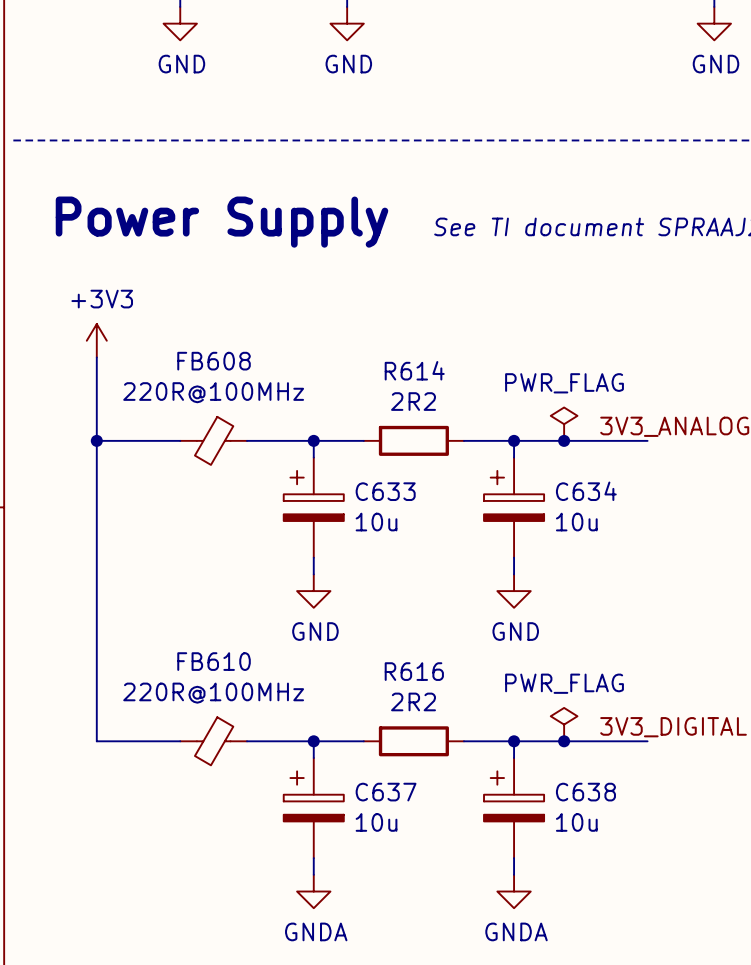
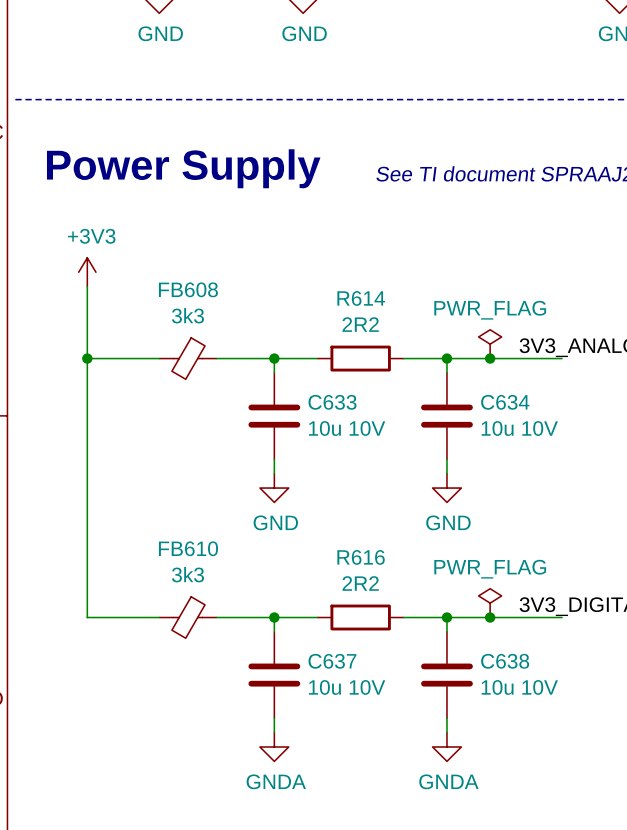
FB608 value: 220R@100MHz (213, 392) -> 3k3 (187, 315)
C633 symbol: [283, 457, 344, 558] -> [248, 372, 301, 460]
C634 symbol: [484, 457, 545, 558] -> [421, 372, 473, 460]
C633 value: 10u (376, 522) -> 10u 10V (347, 428)
C634 value: 10u (576, 522) -> 10u 10V (519, 428)
FB610 value: 220R@100MHz (213, 693) -> 3k3 (187, 574)
C637 symbol: [283, 757, 344, 859] -> [248, 631, 301, 719]
C638 symbol: [484, 757, 545, 859] -> [421, 631, 473, 719]
C637 value: 10u (376, 822) -> 10u 10V (347, 687)
C638 value: 10u (576, 822) -> 10u 10V (519, 687)

